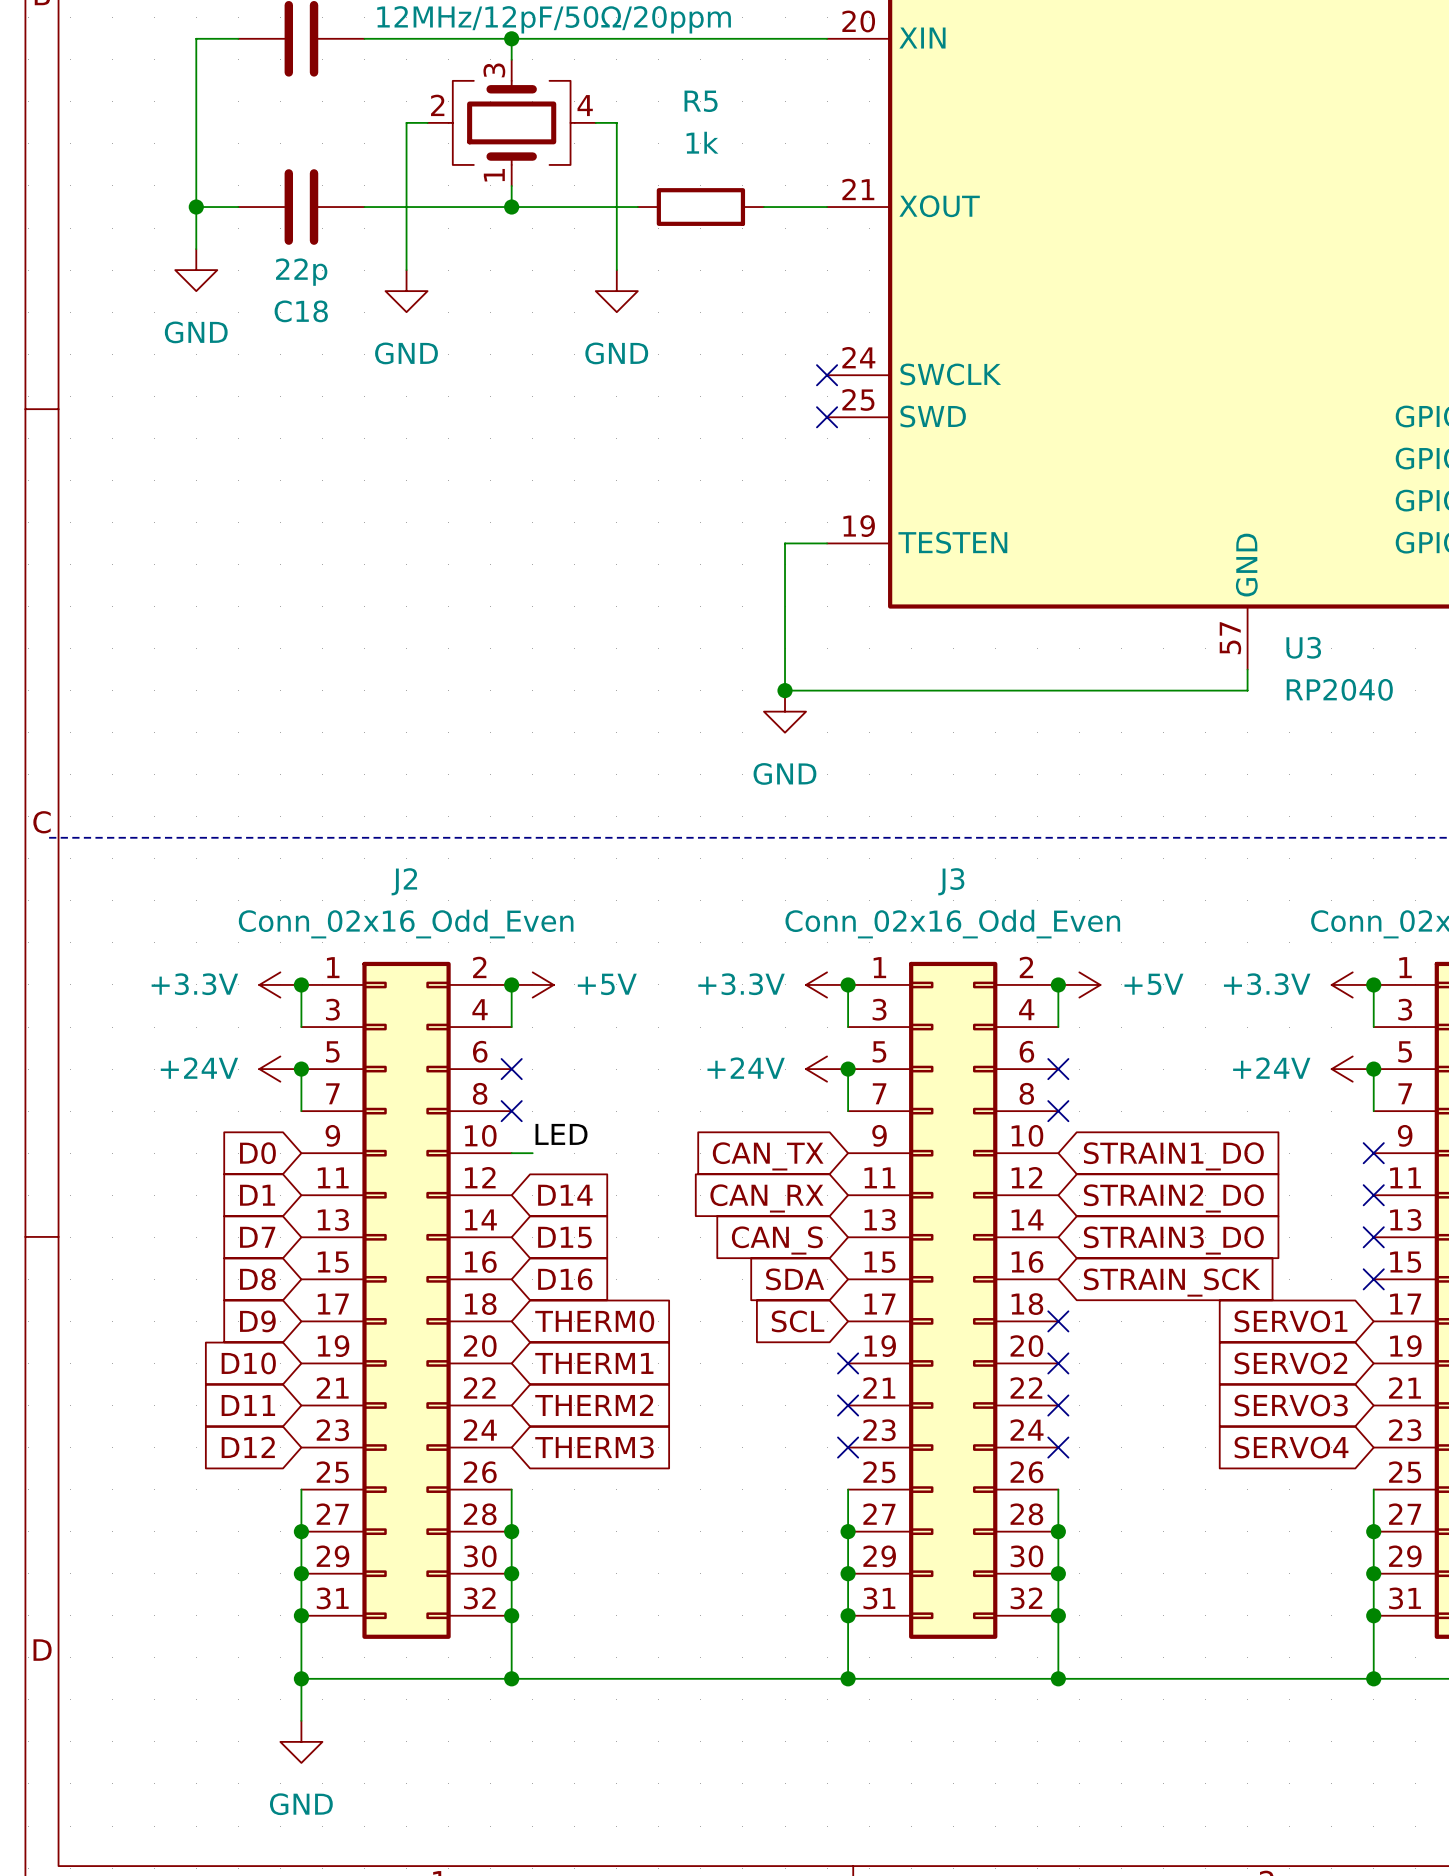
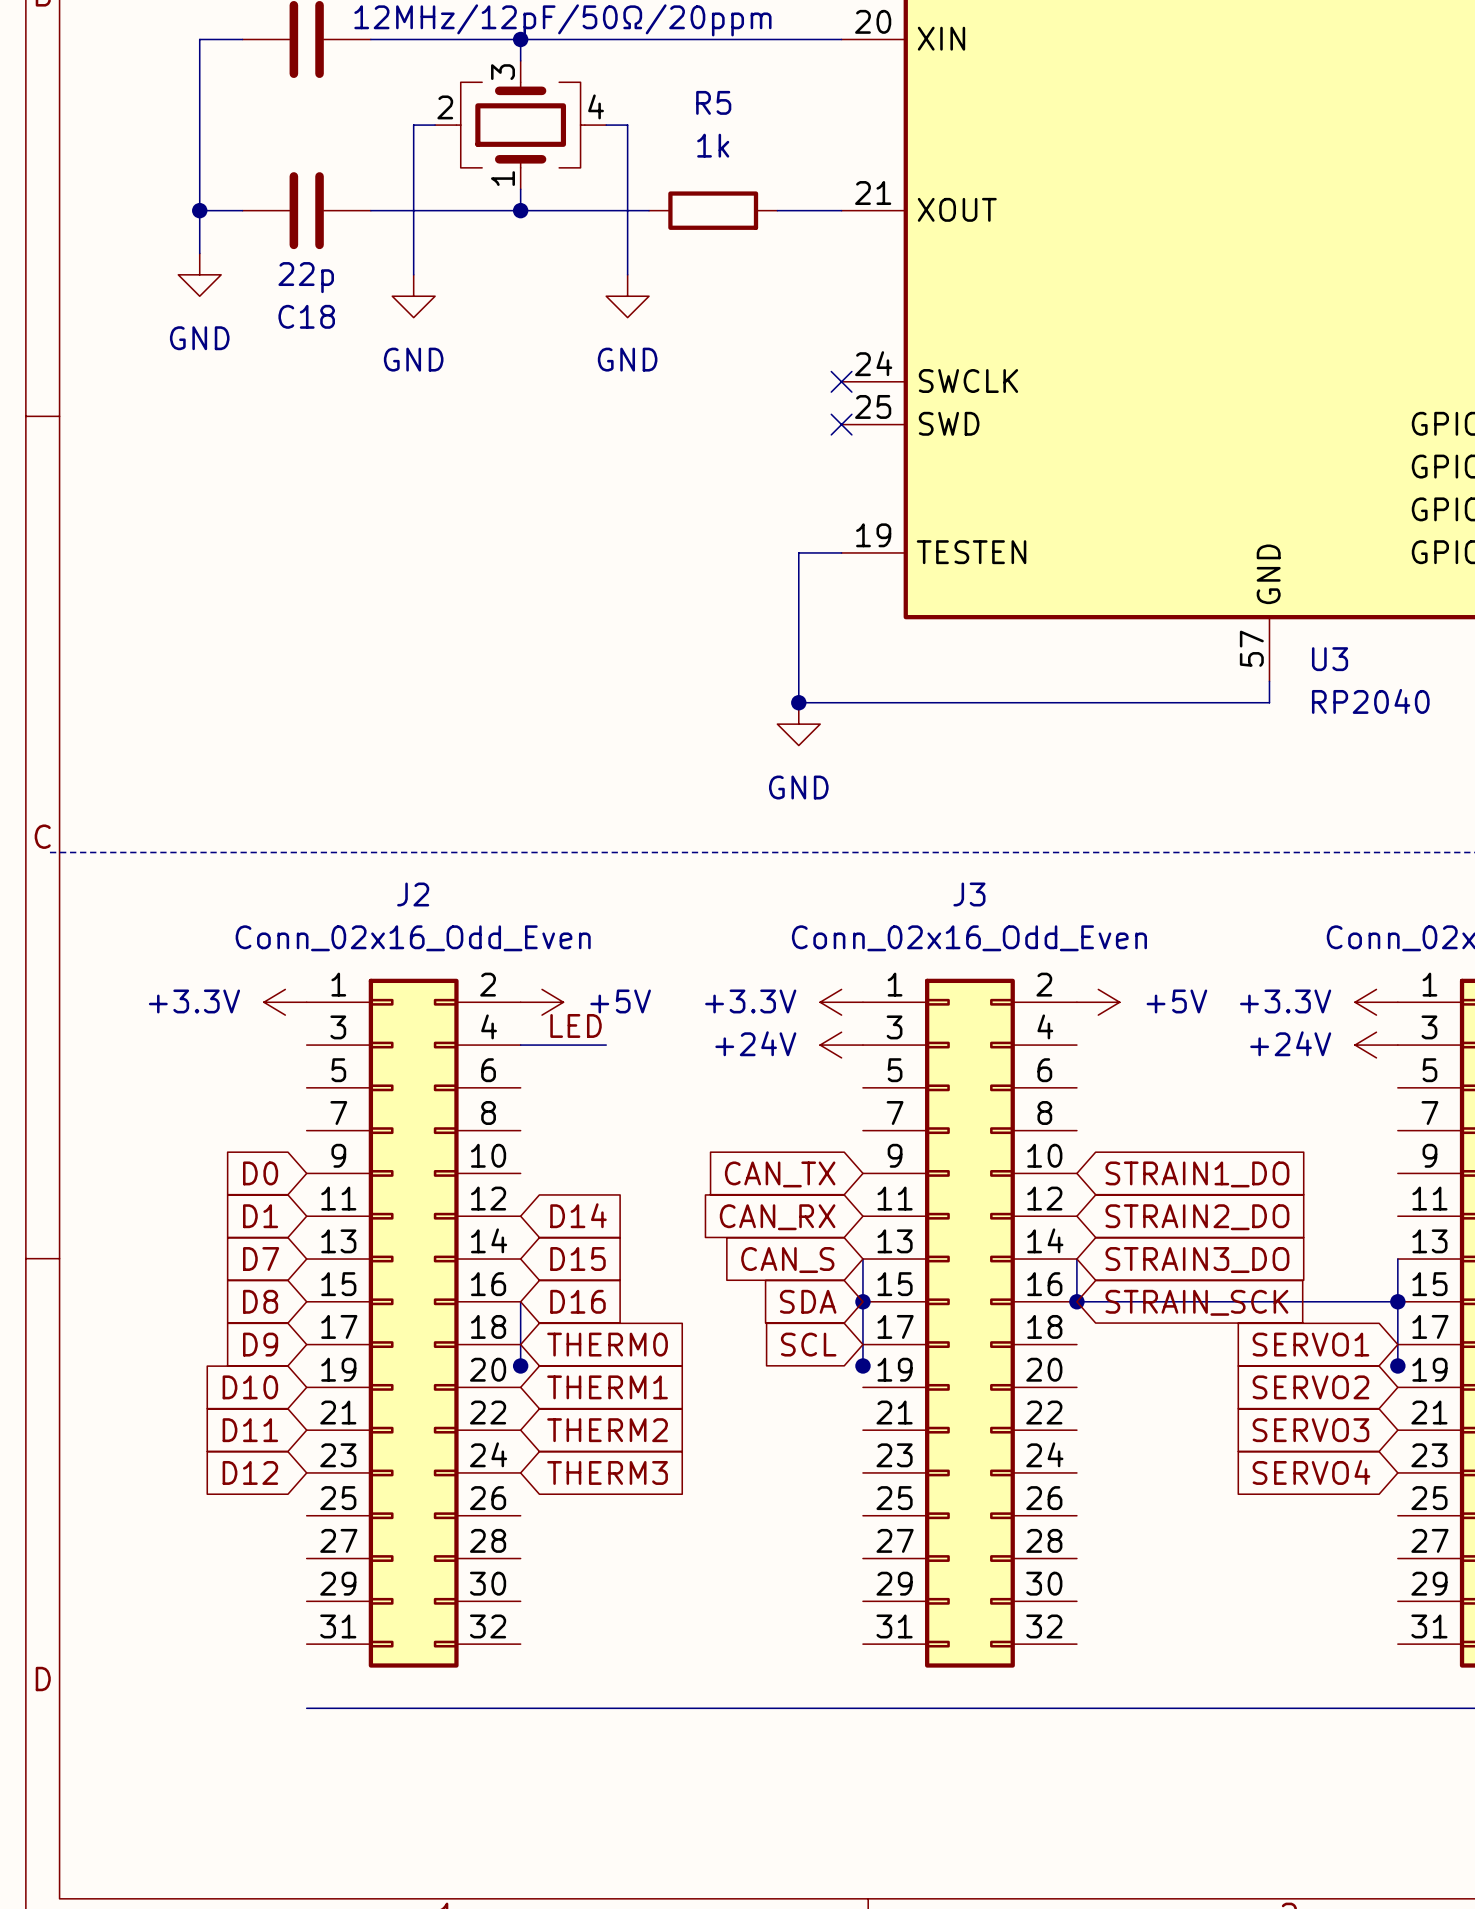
wire: (301, 984) (301, 1027) -> none
junction: (301, 984) -> none
wire: (511, 984) (511, 1027) -> (606, 1045) (520, 1045)
junction: (511, 984) -> none
wire: (848, 984) (848, 1027) -> none
junction: (848, 984) -> none
wire: (1058, 984) (1058, 1027) -> none
junction: (1058, 984) -> none
wire: (1373, 984) (1373, 1027) -> none
junction: (1373, 984) -> none
power symbol: +24V (280, 1069) -> none
wire: (301, 1069) (301, 1111) -> none
junction: (301, 1069) -> none
no-connect mark: (511, 1069) -> none
power symbol position: +24V (827, 1069) -> +24V (841, 1045)
wire: (848, 1069) (848, 1111) -> none
junction: (848, 1069) -> none
no-connect mark: (1058, 1069) -> none
power symbol position: +24V (1352, 1069) -> +24V (1376, 1045)
wire: (1373, 1069) (1373, 1111) -> none
junction: (1373, 1069) -> none
no-connect mark: (511, 1111) -> none
no-connect mark: (1058, 1111) -> none
label position: LED (561, 1134) -> LED (576, 1025)
wire: (511, 1153) (532, 1153) -> none
no-connect mark: (1373, 1153) -> none
no-connect mark: (1373, 1195) -> none
wire: none -> (862, 1259) (862, 1365)
wire: none -> (1076, 1259) (1076, 1301) (1397, 1301)
wire: none -> (1397, 1259) (1397, 1365)
no-connect mark: (1373, 1237) -> none
wire: none -> (520, 1301) (520, 1365)
junction: none -> (862, 1301)
junction: none -> (1076, 1301)
junction: none -> (1397, 1301)
no-connect mark: (1373, 1279) -> none
no-connect mark: (1058, 1321) -> none
junction: none -> (520, 1365)
junction: none -> (862, 1365)
junction: none -> (1397, 1365)
no-connect mark: (848, 1363) -> none
no-connect mark: (1058, 1363) -> none
no-connect mark: (848, 1405) -> none
no-connect mark: (1058, 1405) -> none
no-connect mark: (848, 1447) -> none
no-connect mark: (1058, 1447) -> none
wire: (301, 1489) (301, 1720) -> none
wire: (511, 1489) (511, 1678) -> none
wire: (848, 1489) (848, 1678) -> none
wire: (1058, 1489) (1058, 1678) -> none
wire: (1373, 1489) (1373, 1678) -> none
junction: (301, 1531) -> none
junction: (511, 1531) -> none
junction: (848, 1531) -> none
junction: (1058, 1531) -> none
junction: (1373, 1531) -> none
junction: (301, 1573) -> none
junction: (511, 1573) -> none
junction: (848, 1573) -> none
junction: (1058, 1573) -> none
junction: (1373, 1573) -> none
junction: (301, 1615) -> none
junction: (511, 1615) -> none
junction: (848, 1615) -> none
junction: (1058, 1615) -> none
junction: (1373, 1615) -> none
junction: (301, 1678) -> none
junction: (511, 1678) -> none
junction: (848, 1678) -> none
junction: (1058, 1678) -> none
junction: (1373, 1678) -> none
power symbol: GND (301, 1741) -> none

